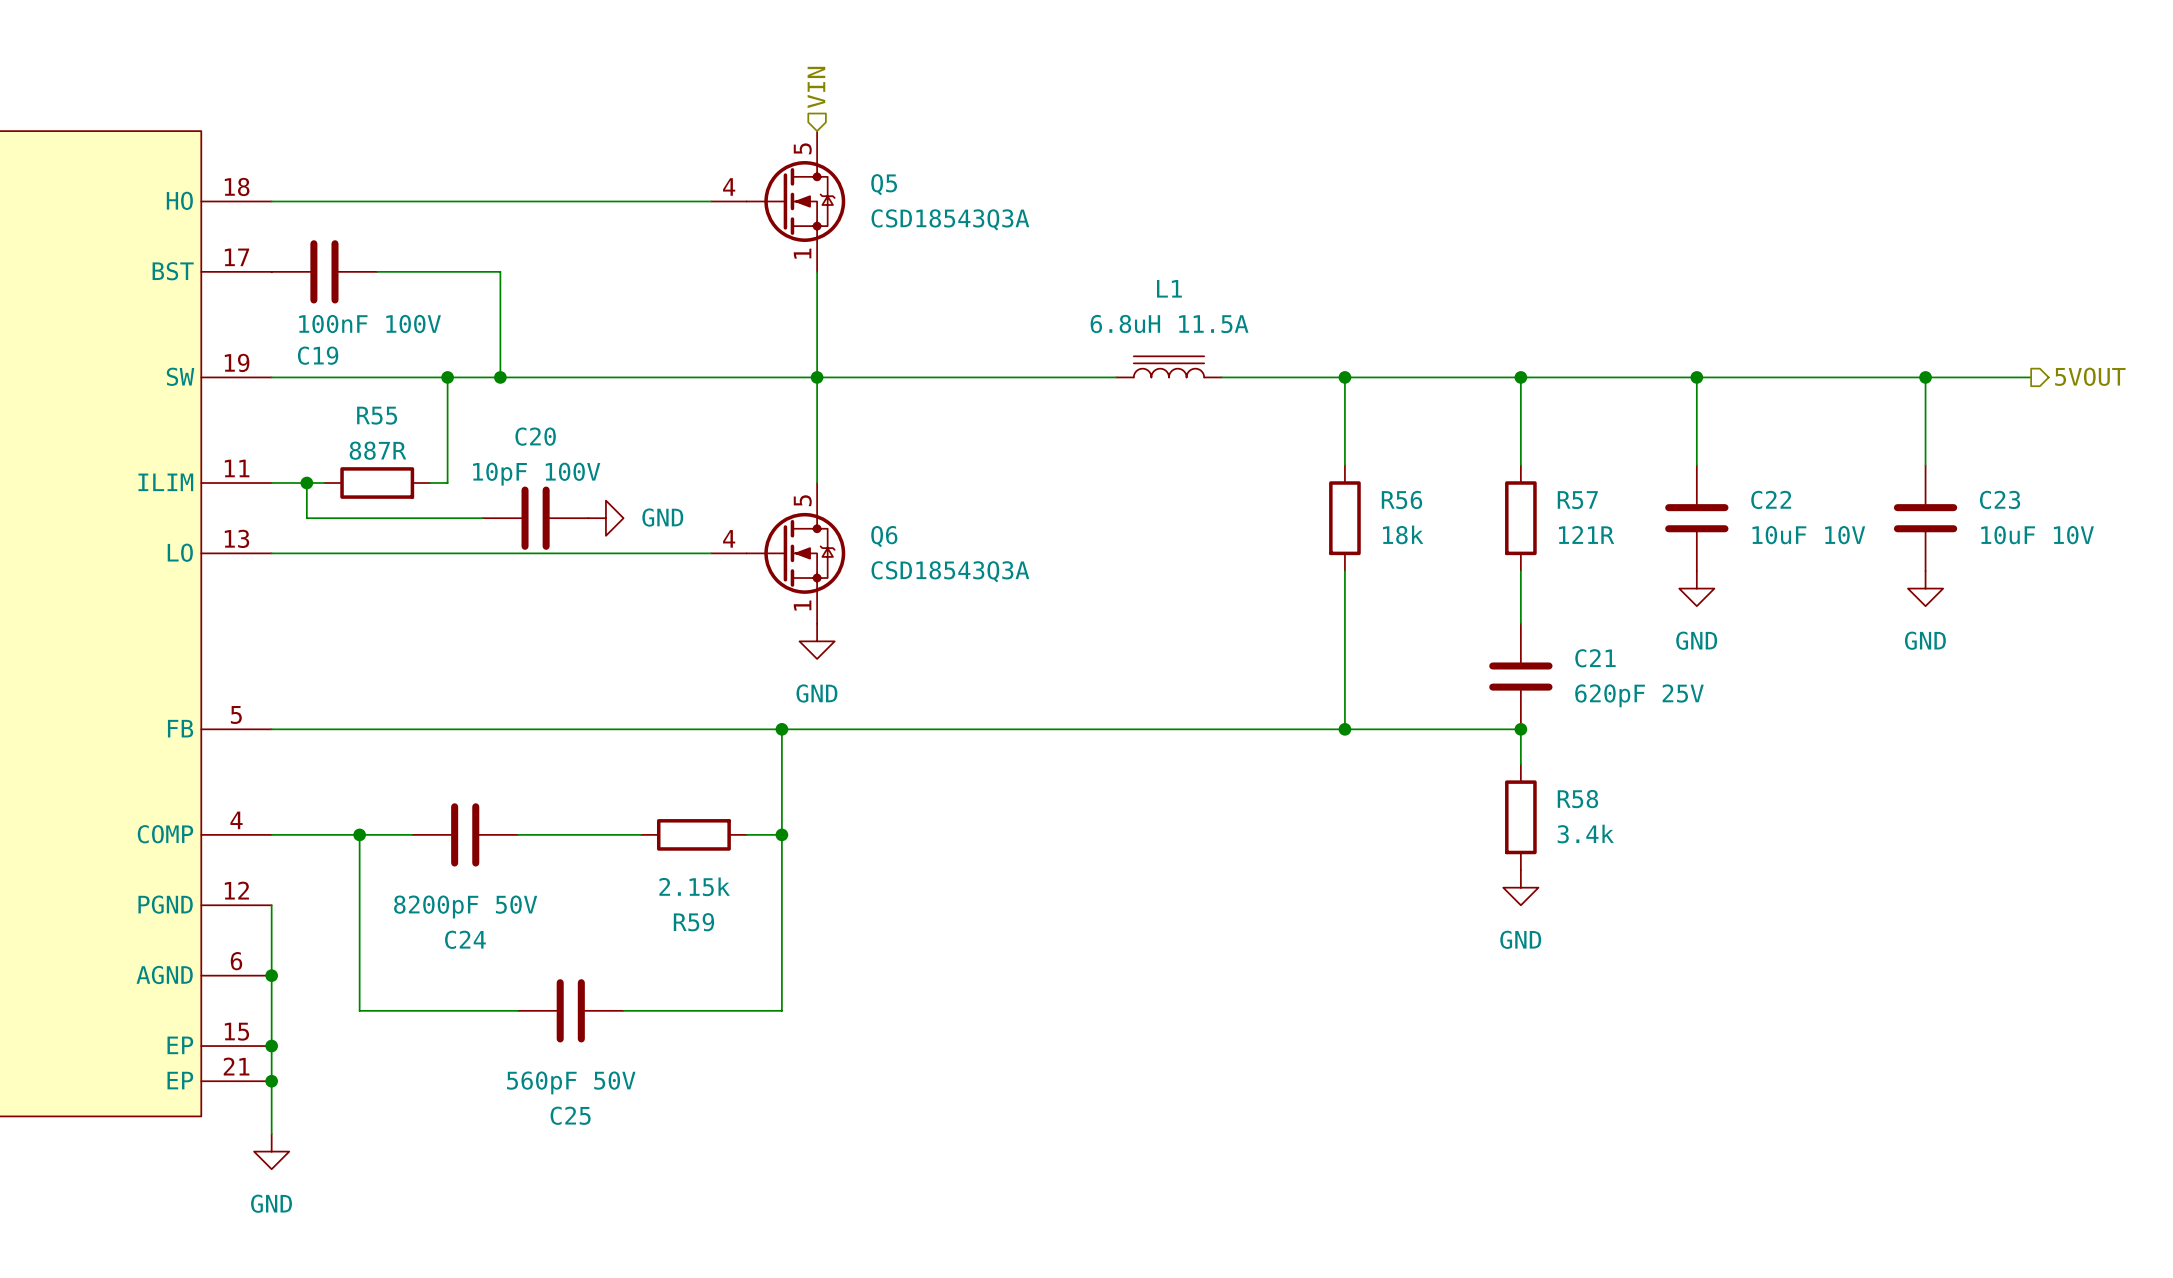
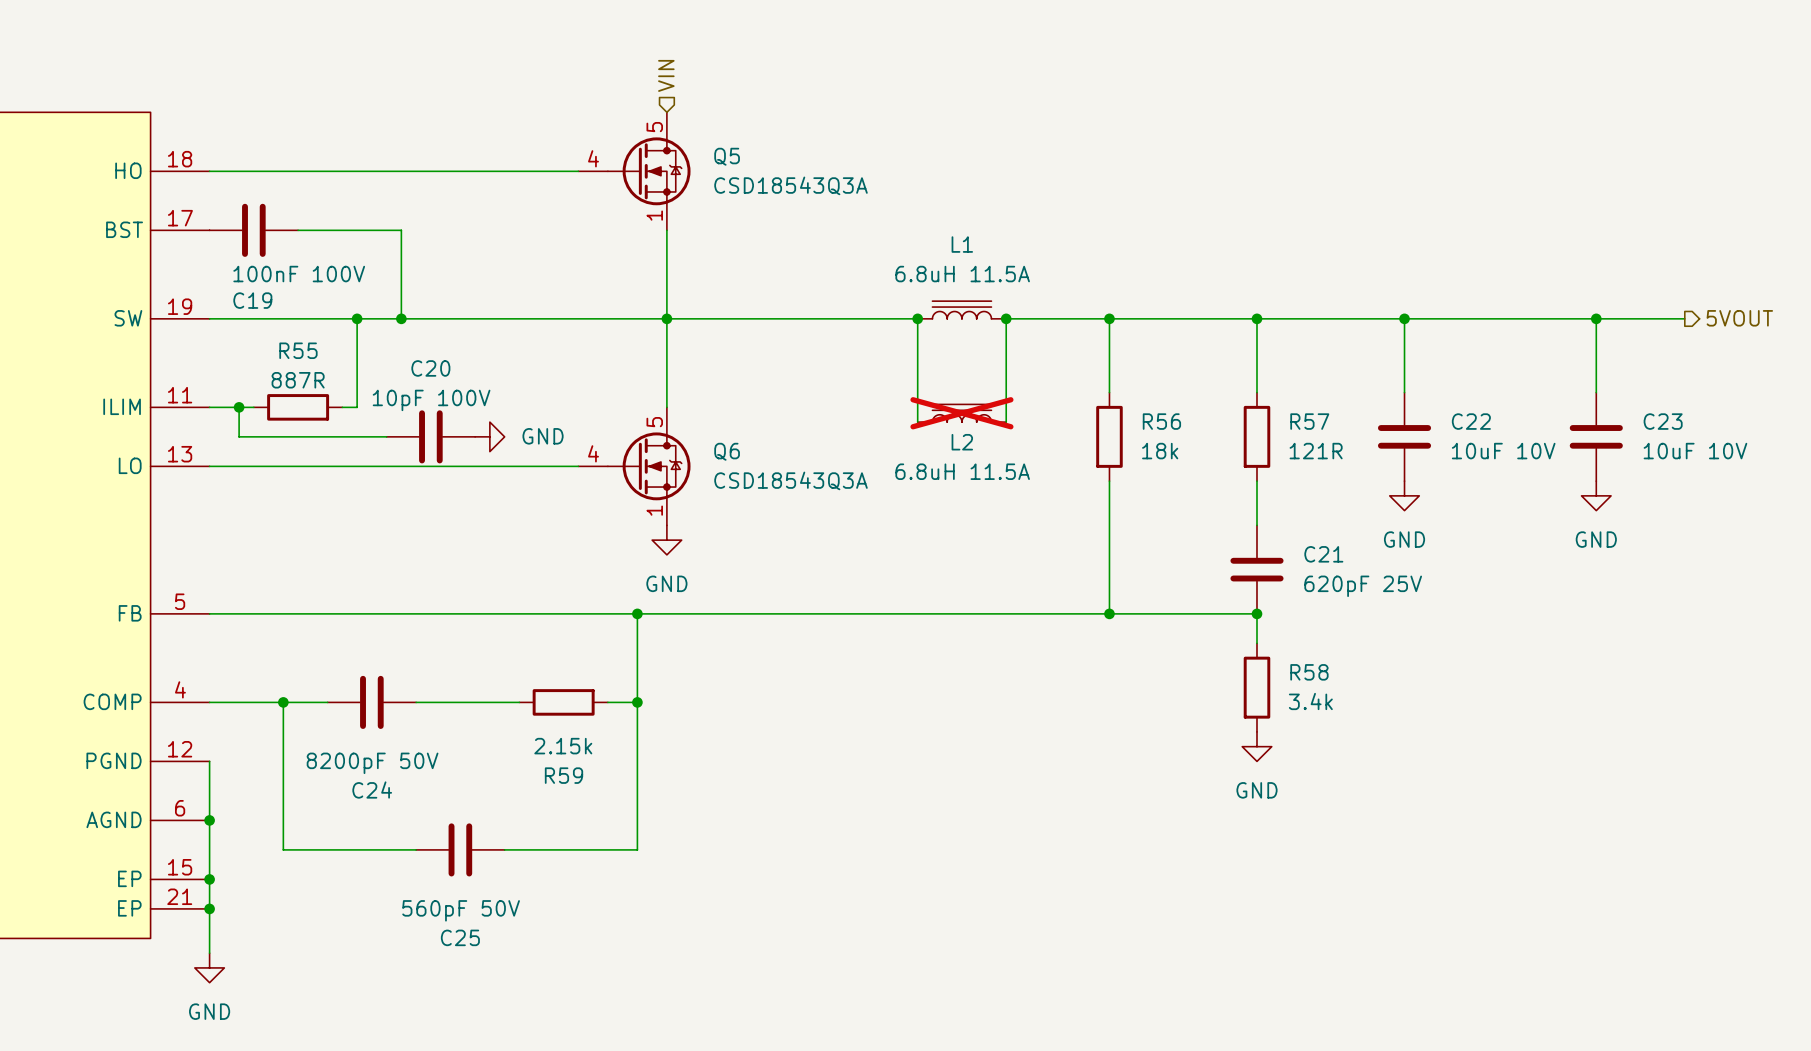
wire: none -> (917, 318) (917, 422)
junction: none -> (917, 318)
wire: none -> (1006, 318) (1006, 422)
junction: none -> (1006, 318)
L2: none -> 6.8uH 11.5A (961, 413)

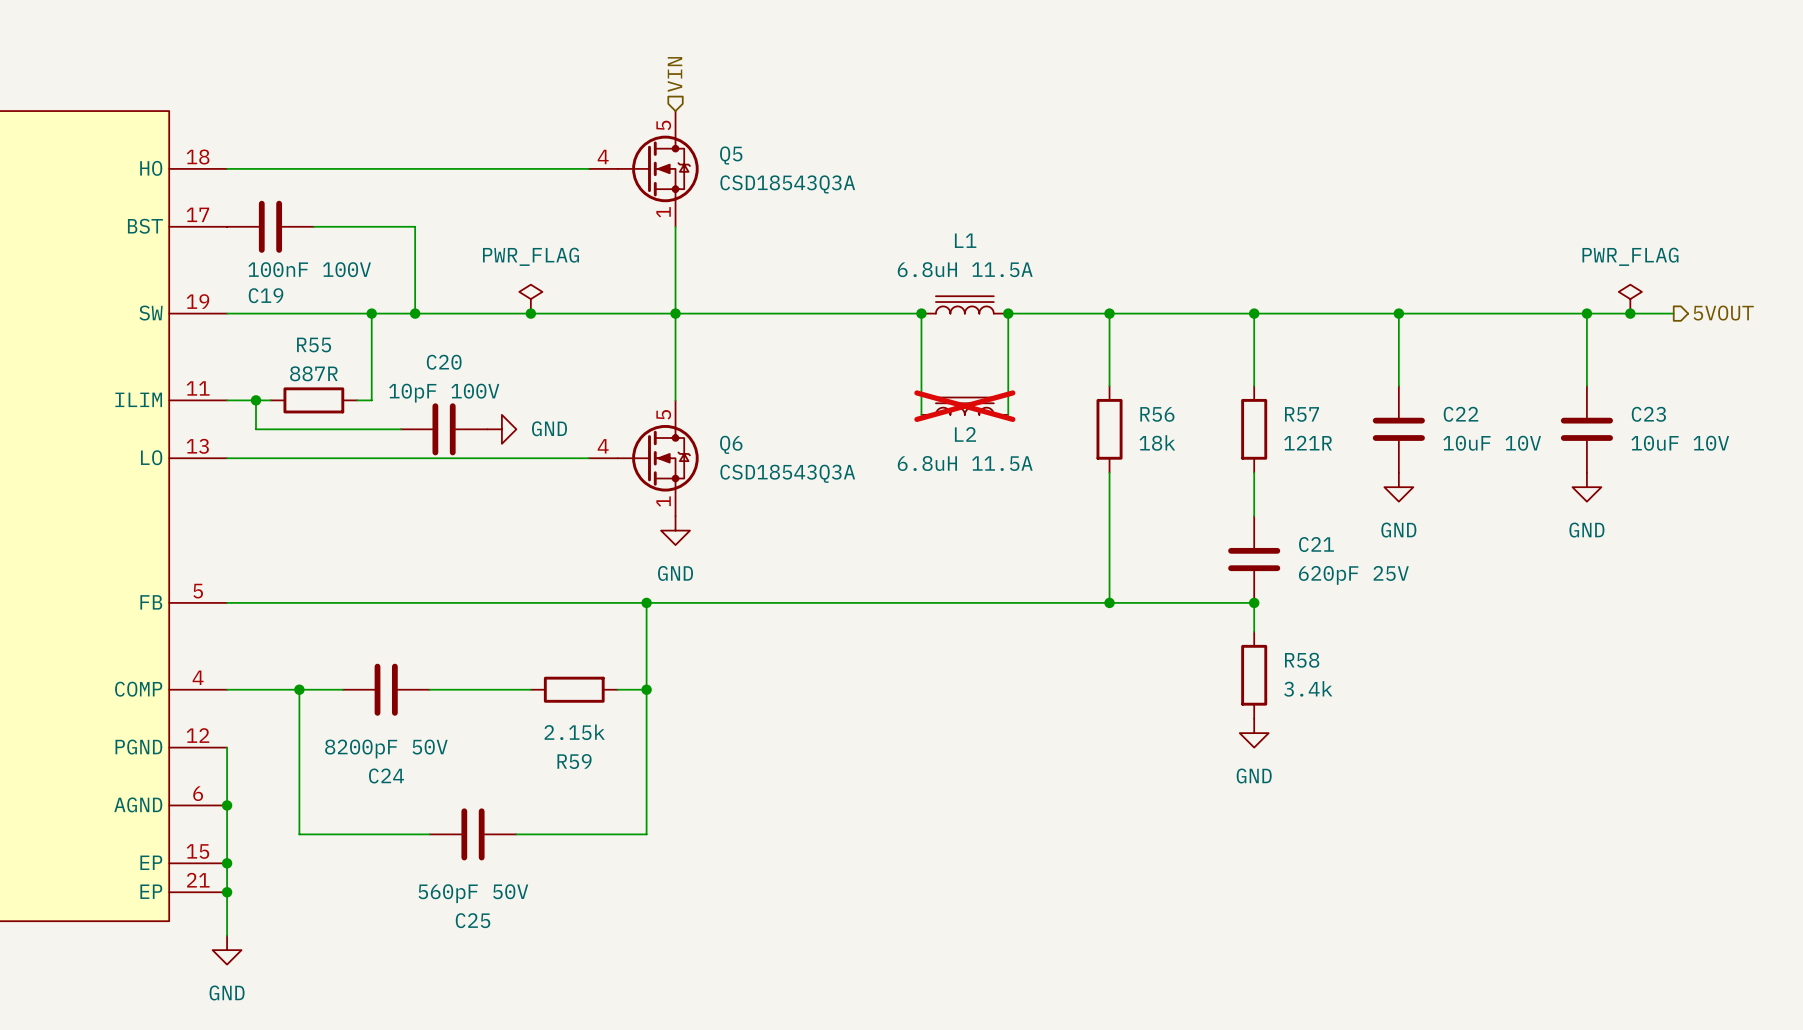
power symbol: none -> PWR_FLAG (530, 299)
power symbol: none -> PWR_FLAG (1630, 299)
junction: none -> (530, 313)
junction: none -> (1630, 313)

